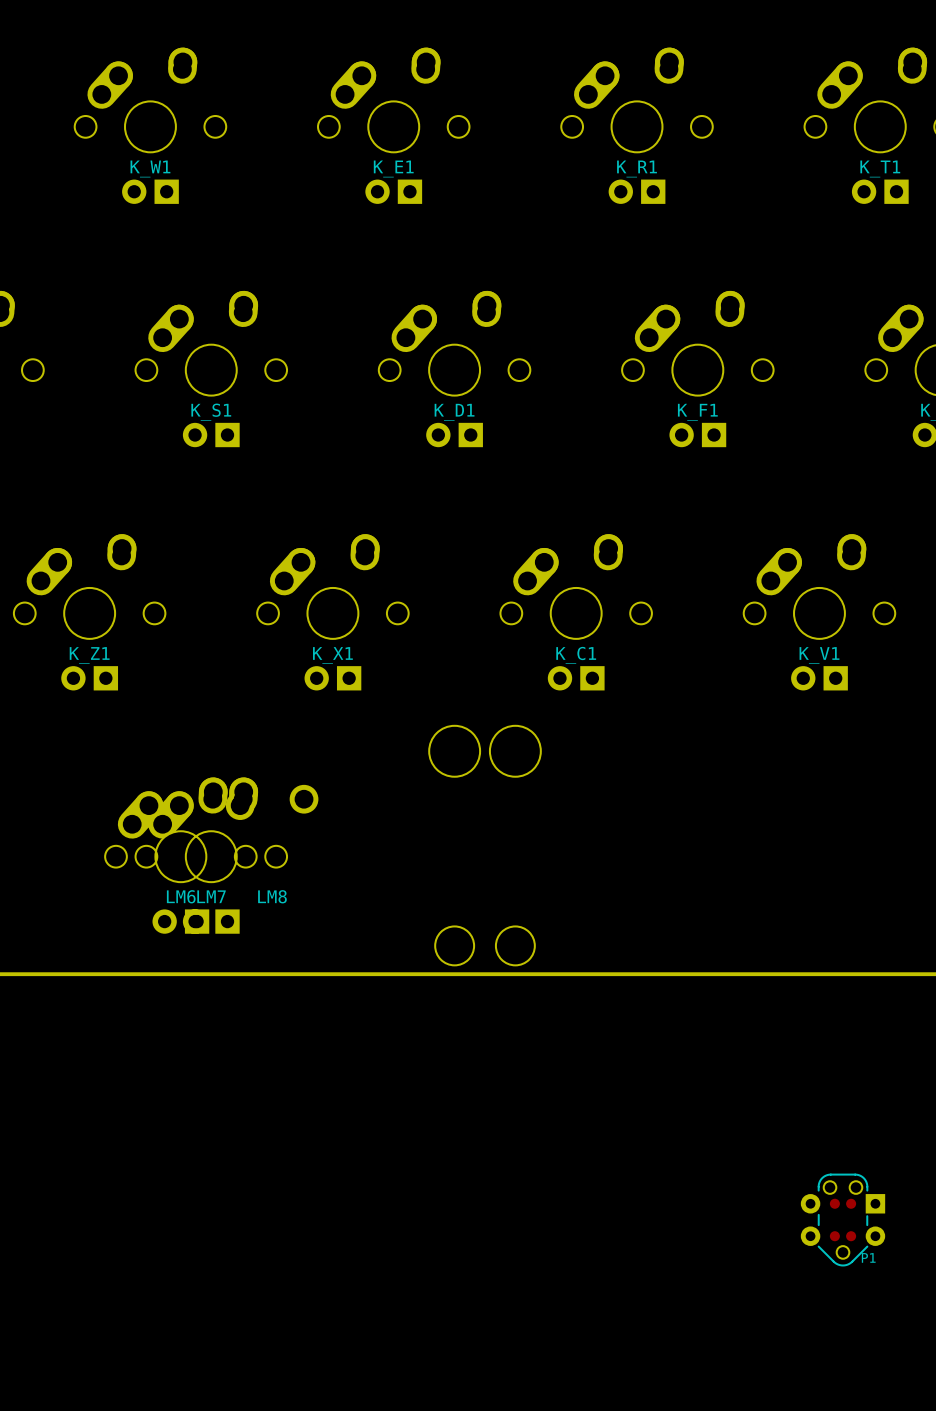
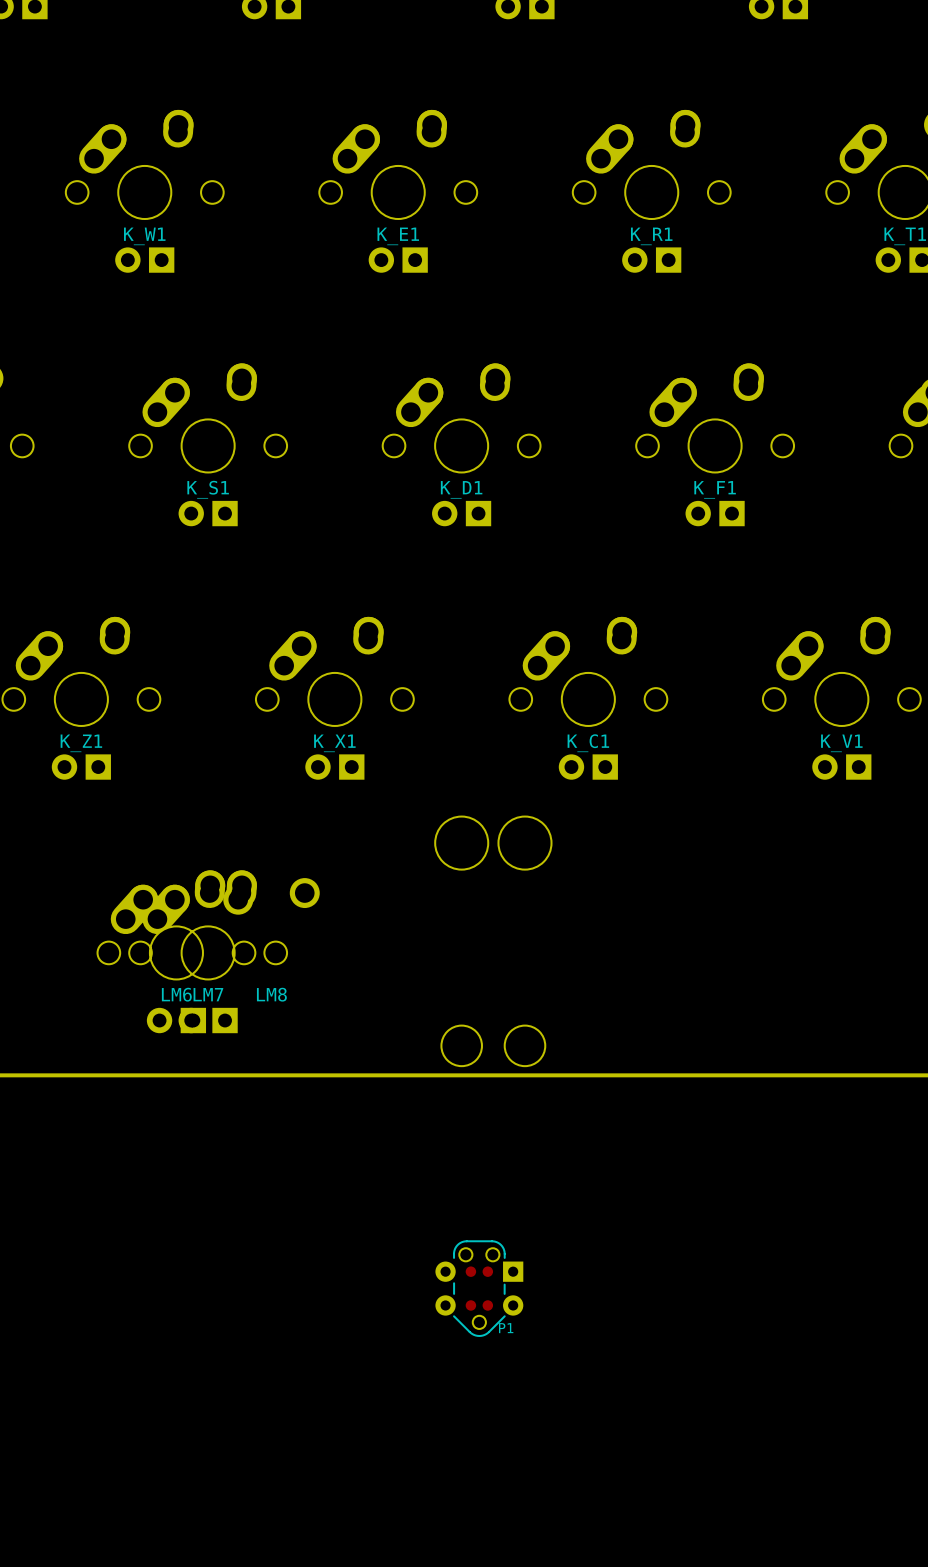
P1 position: (843, 1220) -> (479, 1288)

